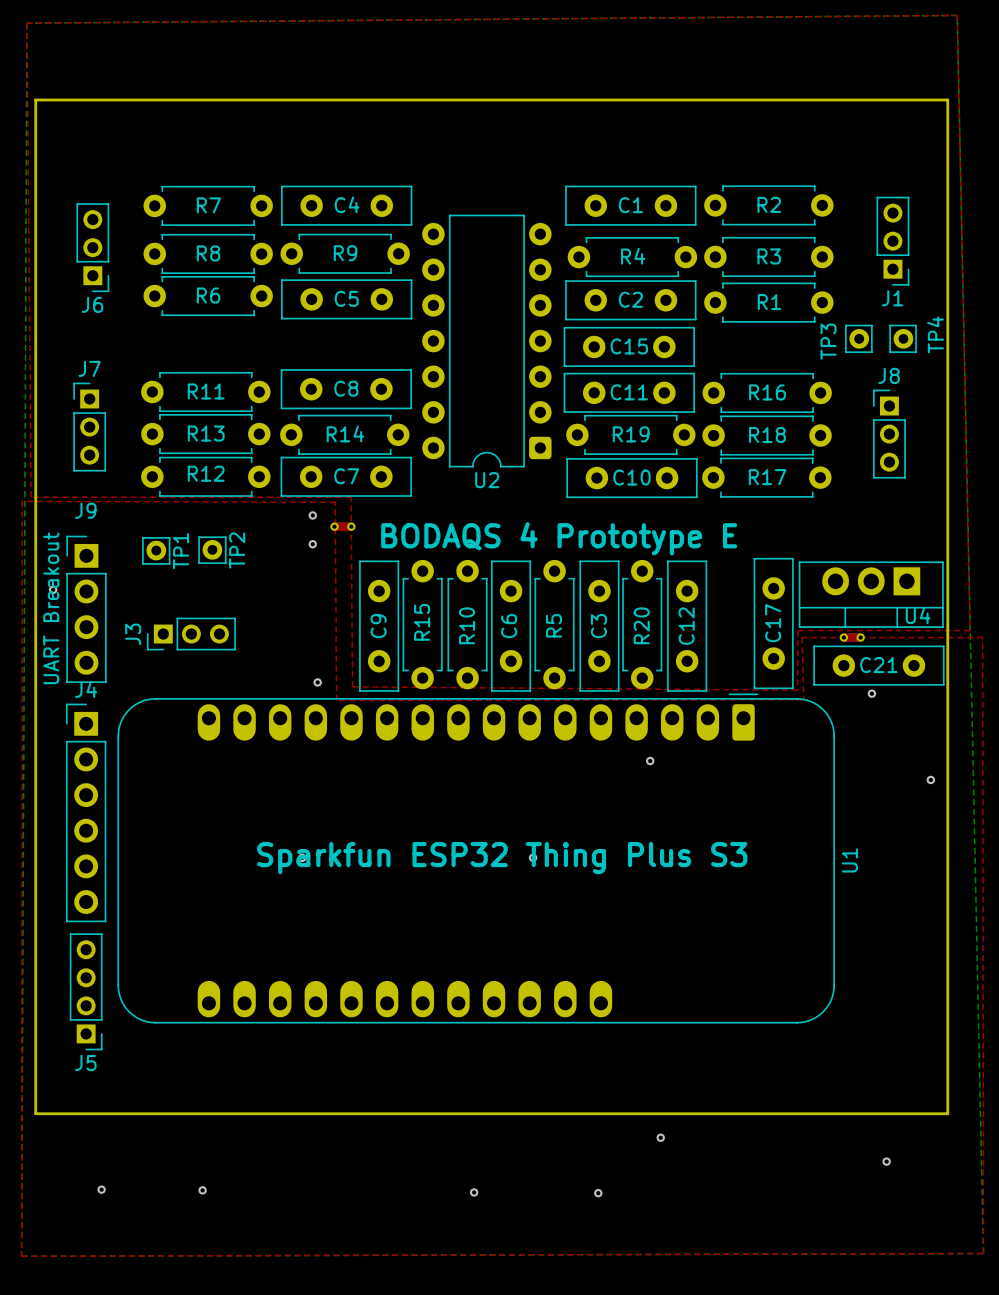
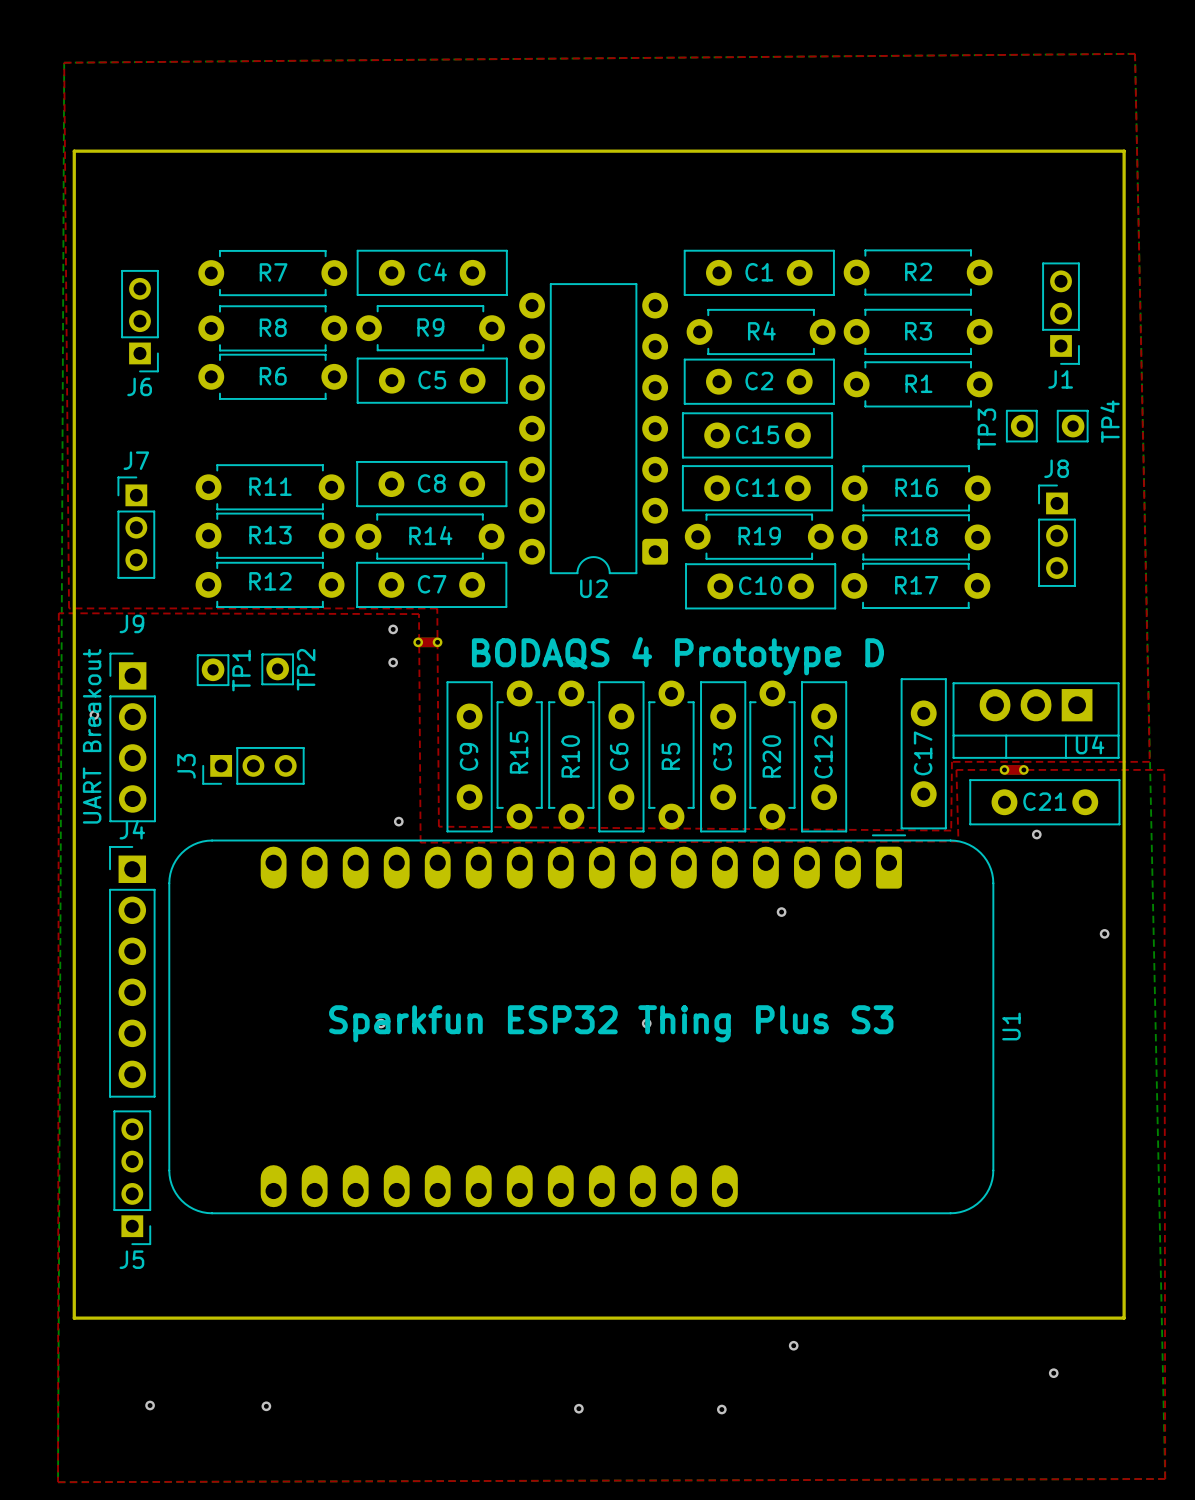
text: BODAQS 4 Prototype E (559, 538) -> BODAQS 4 Prototype D (677, 656)

